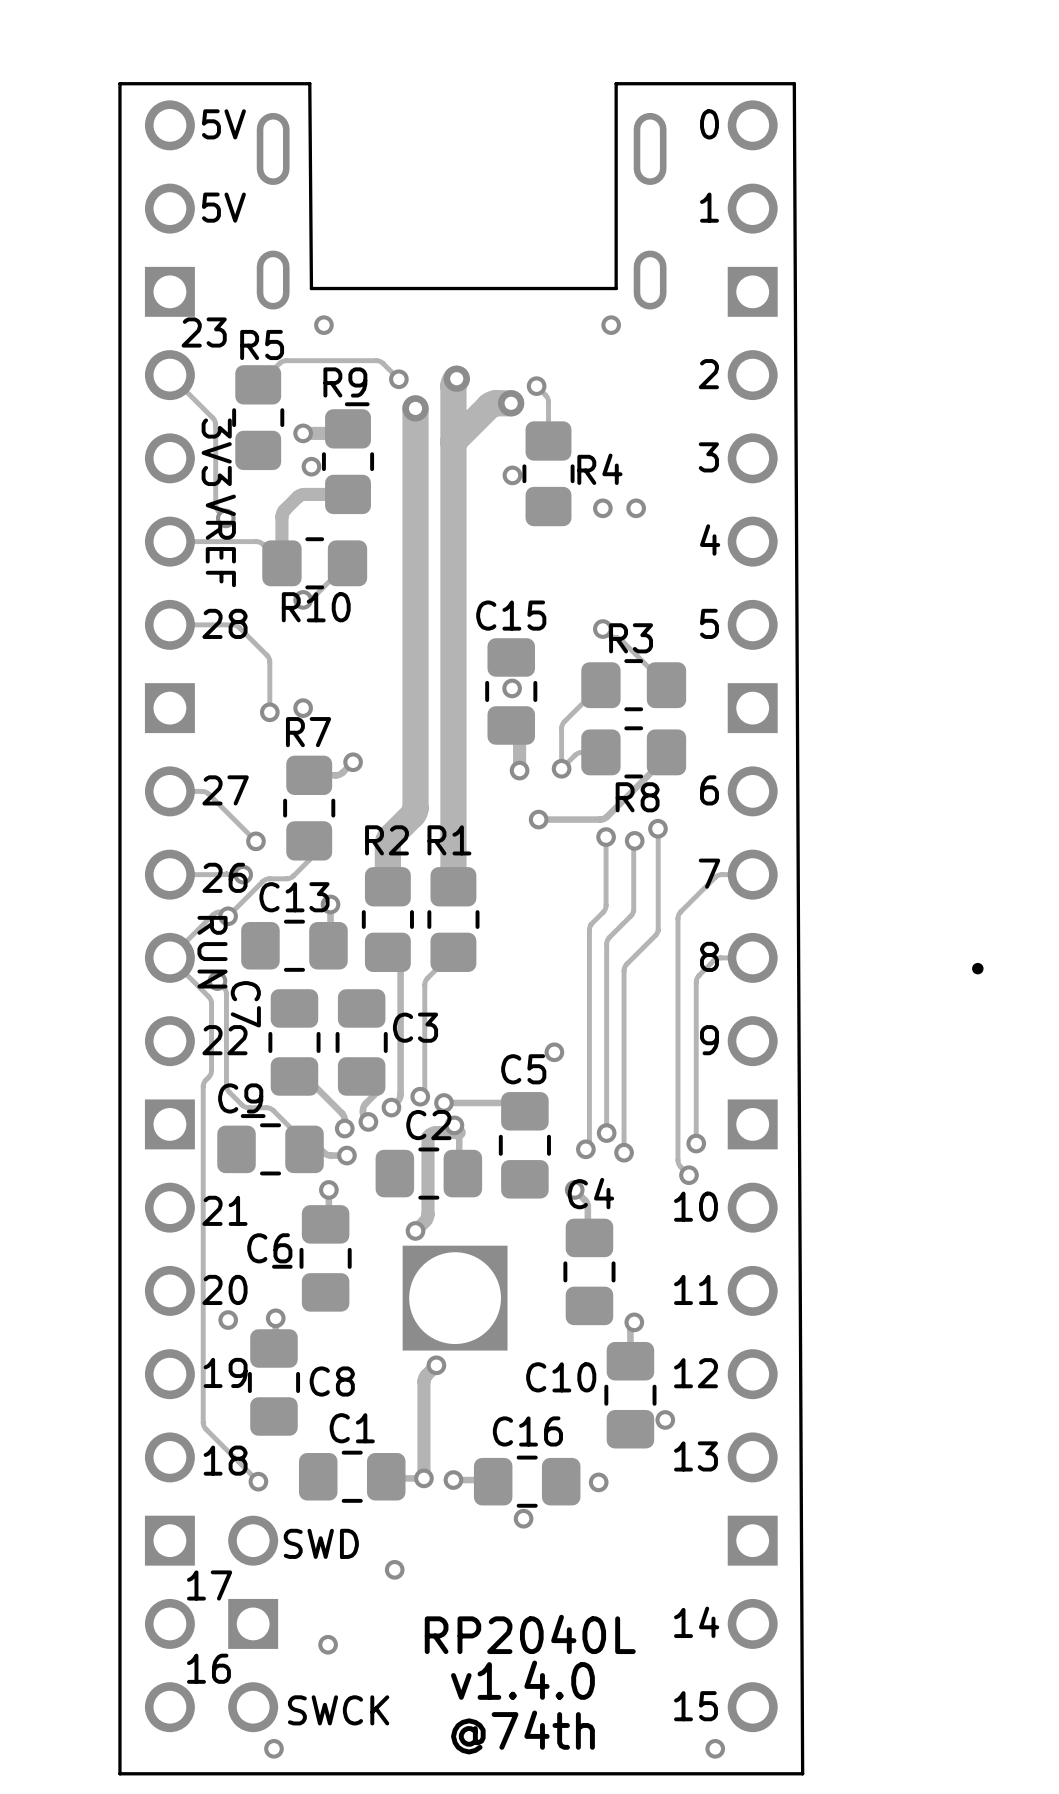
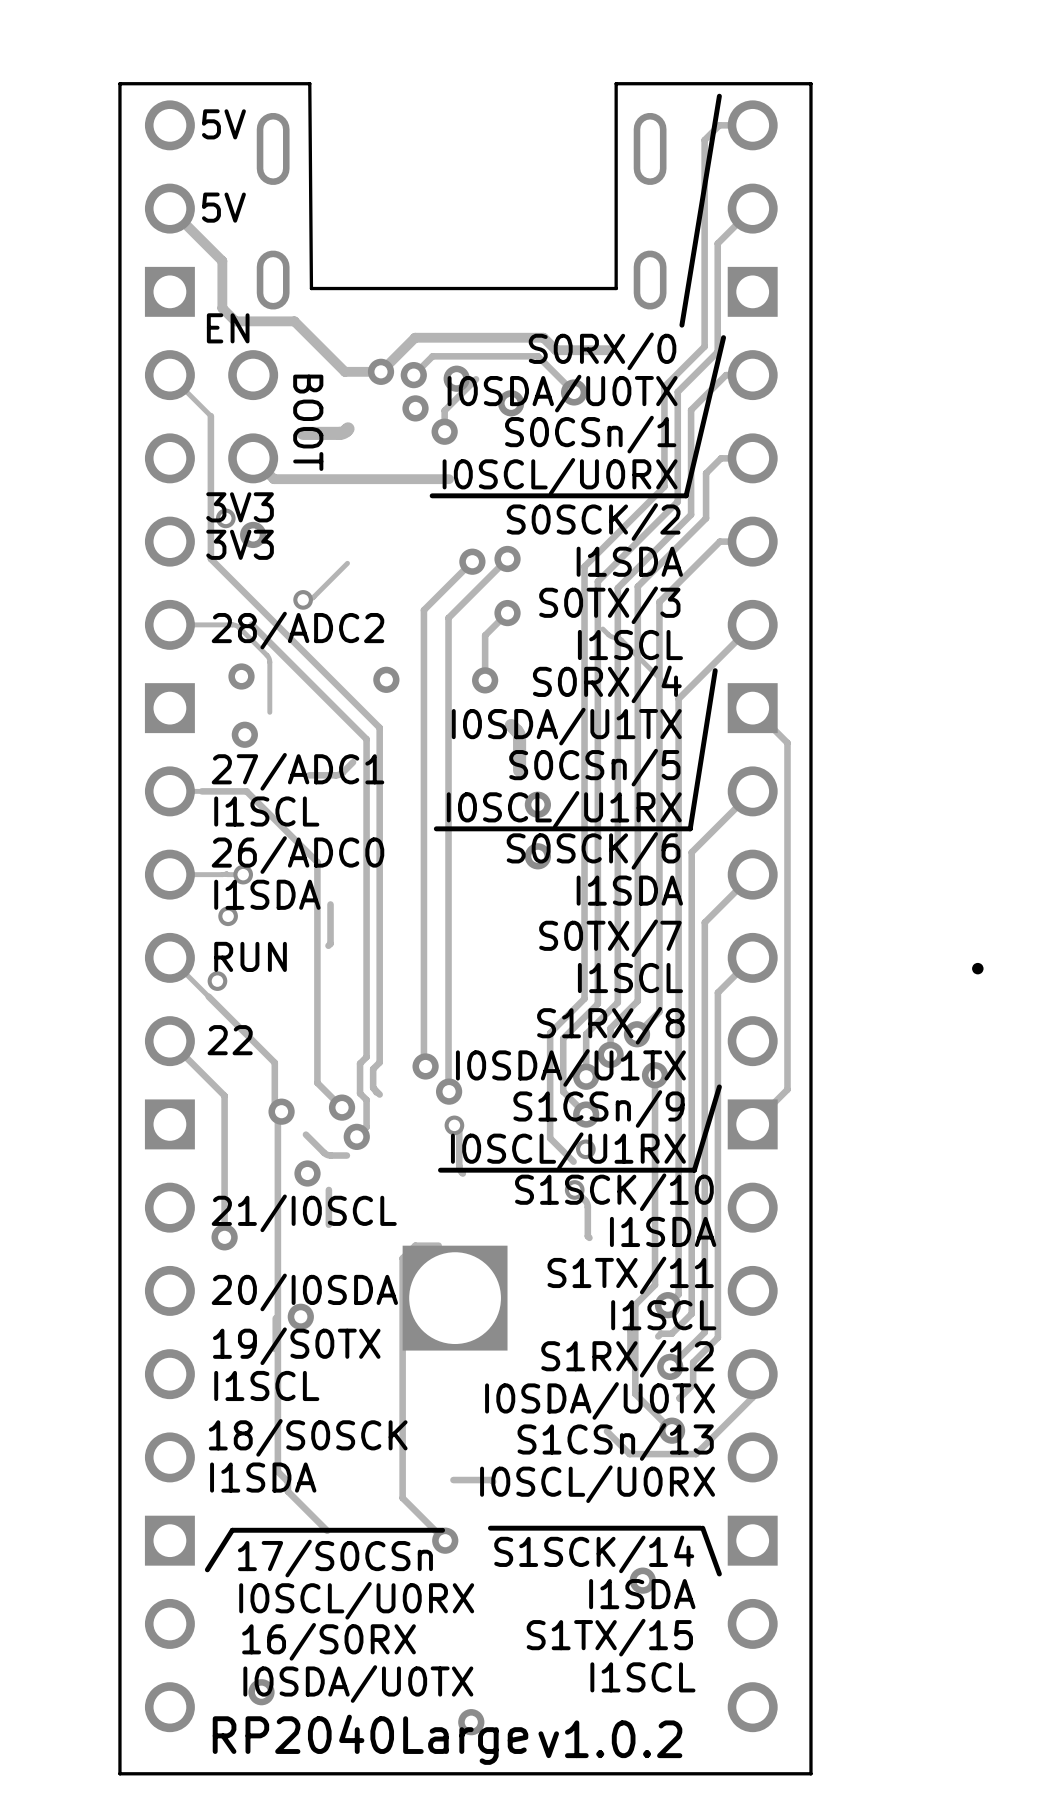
board edge: (794, 83) (802, 1773) -> (794, 83) (810, 83) (810, 1773) (802, 1773)
line: none -> (719, 96) (681, 325)
text: 0 (709, 124) -> none
track: none -> (752, 125) (719, 125) (704, 140) (704, 346) (664, 386) (664, 486) (584, 566) (584, 998) (550, 1033) (550, 1138) (573, 1161)
text: 1 (709, 207) -> none
track: none -> (169, 208) (222, 261) (222, 308) (235, 321) (294, 321) (344, 371) (381, 371) (415, 337) (543, 337) (556, 350) (608, 350)
track: none -> (752, 208) (717, 243) (717, 352) (677, 391) (677, 501) (597, 581) (597, 1003) (563, 1038) (563, 1091) (586, 1114)
via: (323, 325) -> none
via: (611, 325) -> none
text: 23 (204, 332) -> EN (228, 328)
line: none -> (723, 337) (686, 495) (432, 495)
text: none -> S0RX/0 (602, 351)
via: none -> (381, 371)
text: 2 (708, 374) -> none
track: none -> (413, 375) (432, 356) (537, 356) (574, 392)
via: none -> (413, 375)
track: none -> (752, 375) (726, 375) (691, 410) (691, 514) (617, 588) (617, 1002) (586, 1034) (586, 1076)
track: (398, 379) (378, 360) (286, 360) (280, 362) (258, 384) -> none
via: (398, 379) -> none
track: (456, 379) (453, 386) (453, 886) -> none
track: none -> (476, 379) (444, 410) (444, 431)
track: (536, 386) (548, 400) (548, 440) -> none
via: (536, 386) -> none
via: none -> (574, 392)
text: none -> I0SDA/U0TX (562, 393)
track: (511, 403) (490, 404) (453, 441) -> none
line: (367, 404) (346, 404) -> none
track: (415, 408) (415, 809) (413, 814) (388, 841) (387, 886) -> none
track: (210, 416) (215, 424) (215, 505) (225, 518) -> (210, 416) (210, 558) (379, 727) (379, 1062) (373, 1069) (373, 1088)
part: none -> (253, 416)
R5: (258, 417) -> none
text: none -> BOOT (308, 422)
via: none -> (444, 431)
via: (303, 433) -> none
text: none -> S0CSn/1 (590, 434)
text rotation: 0° (216, 452) -> 90° counterclockwise (240, 507)
text: 3 (708, 457) -> none
track: none -> (253, 458) (273, 479) (448, 479)
track: none -> (752, 458) (721, 458) (706, 473) (706, 518) (637, 586) (637, 1001) (610, 1028) (610, 1054)
R9: (348, 461) -> none
via: (311, 466) -> none
R4: (548, 473) -> none
via: (512, 475) -> none
text: none -> I0SCL/U0RX (560, 476)
track: (348, 494) (302, 494) (284, 509) (281, 515) (281, 563) (258, 541) (169, 541) -> none
via: (602, 508) -> none
via: (636, 508) -> none
text: none -> S0SCK/2 (593, 522)
via: none -> (253, 534)
text: VREF (220, 540) -> none
text: 4 (710, 540) -> none
track: none -> (752, 541) (719, 541) (659, 602) (659, 1011) (636, 1034)
text: none -> 3V3 (240, 544)
track: none -> (507, 558) (448, 618) (449, 1091)
via: none -> (507, 558)
track: none -> (472, 561) (423, 610) (423, 1064) (425, 1066)
via: none -> (472, 561)
text: none -> I1SDA (629, 561)
R10: (314, 563) -> none
text: none -> S0TX/3 (609, 605)
track: none -> (507, 613) (485, 635) (485, 680)
via: none -> (507, 613)
text: 28 (224, 623) -> none
text: 5 (709, 623) -> none
track: none -> (251, 624) (366, 739) (366, 1057) (360, 1063) (360, 1093) (366, 1099) (366, 1127) (356, 1136)
track: none -> (752, 624) (678, 698) (678, 1294) (667, 1305)
via: (602, 629) -> none
text: none -> 28/ADC2 (297, 630)
text: none -> I1SCL (630, 645)
line: none -> (715, 670) (690, 828) (436, 828)
via: none -> (241, 676)
via: none -> (386, 679)
via: none -> (485, 680)
text: none -> S0RX/4 (607, 684)
track: (600, 685) (562, 724) (561, 768) (578, 753) (600, 752) -> none
R3: (633, 685) -> none
via: (512, 688) -> none
C15: (511, 691) -> none
via: (303, 708) -> none
track: none -> (752, 708) (787, 742) (787, 1089) (752, 1124)
via: (269, 712) -> none
text: none -> I0SDA/U1TX (566, 726)
via: none -> (244, 734)
R8: (633, 752) -> none
track: (666, 752) (663, 760) (604, 818) (538, 819) -> none
via: (353, 762) -> none
text: none -> S0CSn/5 (594, 767)
via: (561, 768) -> none
via: (519, 770) -> none
text: none -> 27/ADC1 (297, 771)
text: 27 (225, 790) -> none
text: 6 (709, 790) -> none
track: (201, 791) (208, 794) (255, 841) -> (201, 791) (246, 791) (317, 862) (317, 1082) (342, 1107)
track: none -> (752, 791) (691, 852) (691, 1313) (671, 1333) (660, 1333) (658, 1336)
R7: (309, 808) -> none
text: none -> I0SCL/U1RX (564, 809)
text: none -> I1SCL (266, 811)
via position: (538, 819) -> (537, 804)
via: (657, 828) -> none
track: (658, 829) (658, 930) (626, 964) (624, 970) (624, 1152) -> none
track: (606, 837) (605, 907) (591, 924) (589, 930) (589, 1141) (585, 1149) -> none
via: (606, 837) -> none
track: (309, 840) (309, 860) (293, 875) (288, 878) (264, 880) (228, 916) -> none
track: (634, 840) (633, 910) (608, 938) (606, 943) (606, 1133) -> none
via: (634, 840) -> none
via: (255, 841) -> none
text: none -> S0SCK/6 (593, 850)
text: none -> 26/ADC0 (297, 855)
via: none -> (537, 856)
text: 7 (709, 873) -> none
track: (752, 874) (717, 875) (680, 911) (678, 916) (677, 1160) (679, 1165) (688, 1175) -> (752, 874) (704, 922) (704, 1332) (670, 1366)
text: 26 (224, 877) -> none
text: none -> I1SDA (629, 890)
text: none -> I1SDA (267, 894)
via: (330, 904) -> none
track: (226, 915) (220, 912) (213, 914) (169, 957) -> none
R2: (387, 919) -> none
R1: (453, 919) -> none
text: none -> S0TX/7 (610, 938)
C13: (294, 945) -> none
text rotation: 0° (212, 952) -> 90° counterclockwise (250, 956)
track: (453, 952) (424, 983) (424, 1102) -> none
text: 8 (709, 956) -> none
track: (752, 957) (716, 958) (696, 979) (696, 1143) -> (752, 957) (717, 992) (717, 1337) (693, 1362) (693, 1384) (679, 1398)
track: (394, 958) (387, 952) (398, 962) (400, 969) (400, 1095) (391, 1107) -> none
text: none -> I1SCL (630, 978)
track: (217, 981) (226, 993) (227, 1089) (245, 1107) (271, 1109) (311, 1149) -> none
track: (208, 996) (211, 1003) (211, 1071) (203, 1086) (203, 1423) (206, 1429) (258, 1481) -> (208, 996) (274, 1062) (274, 1104) (281, 1111) (277, 1115) (277, 1471) (287, 1481) (287, 1491) (327, 1530)
text: none -> S1RX/8 (610, 1025)
via: none -> (636, 1034)
text position: 22 (224, 1040) -> 22 (230, 1040)
text: 9 (709, 1040) -> none
track: none -> (169, 1041) (224, 1095) (224, 1237)
C7: (294, 1042) -> none
C3: (361, 1042) -> none
via: (554, 1052) -> none
via: none -> (610, 1054)
via: none -> (425, 1066)
text: none -> I0SDA/U1TX (570, 1067)
track: none -> (655, 1075) (655, 1285) (635, 1304) (635, 1393) (672, 1430)
via: none -> (655, 1075)
track: (294, 1076) (307, 1078) (341, 1113) (344, 1118) (344, 1128) -> none
via: none -> (586, 1076)
line: none -> (719, 1086) (694, 1170) (440, 1170)
track: (376, 1092) (363, 1107) (363, 1115) (368, 1121) -> none
via size: [434, 1093, 454, 1113] -> [435, 1078, 463, 1105]
via: (420, 1096) -> none
track: (444, 1102) (513, 1103) (524, 1111) -> none
via: none -> (342, 1107)
via: (391, 1107) -> none
text: none -> S1CSn/9 (599, 1108)
via: none -> (281, 1111)
line: (263, 1116) (242, 1116) -> none
via: (368, 1121) -> none
via: (344, 1128) -> none
track: (459, 1132) (435, 1132) (428, 1136) (427, 1215) (425, 1220) (415, 1230) -> none
via position: (606, 1133) -> (586, 1114)
via: none -> (356, 1136)
via: (696, 1143) -> none
C5: (524, 1145) -> none
C9: (270, 1149) -> none
text: none -> I0SCL/U1RX (568, 1151)
via: (624, 1152) -> none
via: (346, 1155) -> none
C2: (428, 1173) -> none
via: (688, 1175) -> none
via position: (328, 1189) -> (307, 1173)
text: none -> S1SCK/10 (614, 1192)
text: 10 (695, 1206) -> none
text: 21 (224, 1210) -> none
text: none -> 21/I0SCL (304, 1213)
via: (415, 1230) -> none
text: none -> I1SDA (663, 1231)
via: none -> (224, 1237)
track: none -> (438, 1245) (415, 1245) (402, 1258) (402, 1498) (445, 1540)
C6: (325, 1258) -> none
line: (290, 1266) (273, 1266) -> none
C4: (589, 1271) -> none
text: none -> S1TX/11 (630, 1275)
text: 20 (224, 1289) -> none
text: 11 (695, 1289) -> none
text: none -> 20/I0SDA (304, 1292)
via: none -> (667, 1305)
text: none -> I1SCL (663, 1315)
via: none -> (300, 1316)
via: (275, 1318) -> none
via: (228, 1320) -> none
via: (634, 1322) -> none
text: none -> 19/S0TX (296, 1346)
text: none -> S1RX/12 (627, 1358)
track: (436, 1365) (426, 1375) (423, 1380) (423, 1478) (387, 1478) (386, 1476) -> none
via: (436, 1365) -> none
via: none -> (670, 1366)
text: 19 (225, 1372) -> none
text: 12 (695, 1373) -> none
track: none -> (752, 1374) (752, 1397) (696, 1454) (629, 1454) (606, 1431)
C8: (273, 1382) -> none
text: none -> I1SCL (266, 1385)
C10: (630, 1395) -> none
text: none -> I0SDA/U0TX (600, 1400)
via size: [655, 1410, 676, 1430] -> [658, 1417, 686, 1444]
text: none -> 18/S0SCK (308, 1437)
text: none -> S1CSn/13 (615, 1441)
text: 13 (695, 1456) -> none
text: 18 (225, 1460) -> none
C1: (352, 1476) -> none
text: none -> I1SDA (263, 1477)
via: (423, 1478) -> none
via: (453, 1480) -> none
via: (258, 1481) -> none
C16: (527, 1481) -> none
via: (598, 1482) -> none
text: none -> I0SCL/U0RX (597, 1484)
via: (523, 1518) -> none
line: none -> (700, 1528) (490, 1528)
line: none -> (702, 1528) (719, 1573)
line: none -> (442, 1530) (232, 1530) (207, 1569)
via: none -> (445, 1540)
text: SWD (321, 1543) -> none
text: none -> S1SCK/14 (594, 1554)
text: none -> 17/S0CSn (335, 1558)
via: (394, 1569) -> none
via: none -> (642, 1580)
text: 17 (209, 1585) -> I0SCL/U0RX (356, 1600)
text: none -> I1SDA (642, 1594)
text: 14 (696, 1622) -> none
part: (253, 1623) -> none
text: RP2040L (530, 1634) -> none
text: none -> S1TX/15 (609, 1637)
text: none -> 16/S0RX (329, 1641)
via: (328, 1644) -> none
text: 16 (208, 1668) -> I0SDA/U0TX (358, 1684)
text: none -> I1SCL (642, 1677)
text: v1.4.0 (522, 1680) -> v1.0.2 (610, 1739)
via: none -> (261, 1692)
text: 15 (695, 1706) -> none
text: SWCK (338, 1710) -> none
via: none -> (471, 1722)
text: @74th (522, 1732) -> none
text: none -> RP2040Large (370, 1739)
via: (273, 1748) -> none
via: (715, 1748) -> none

